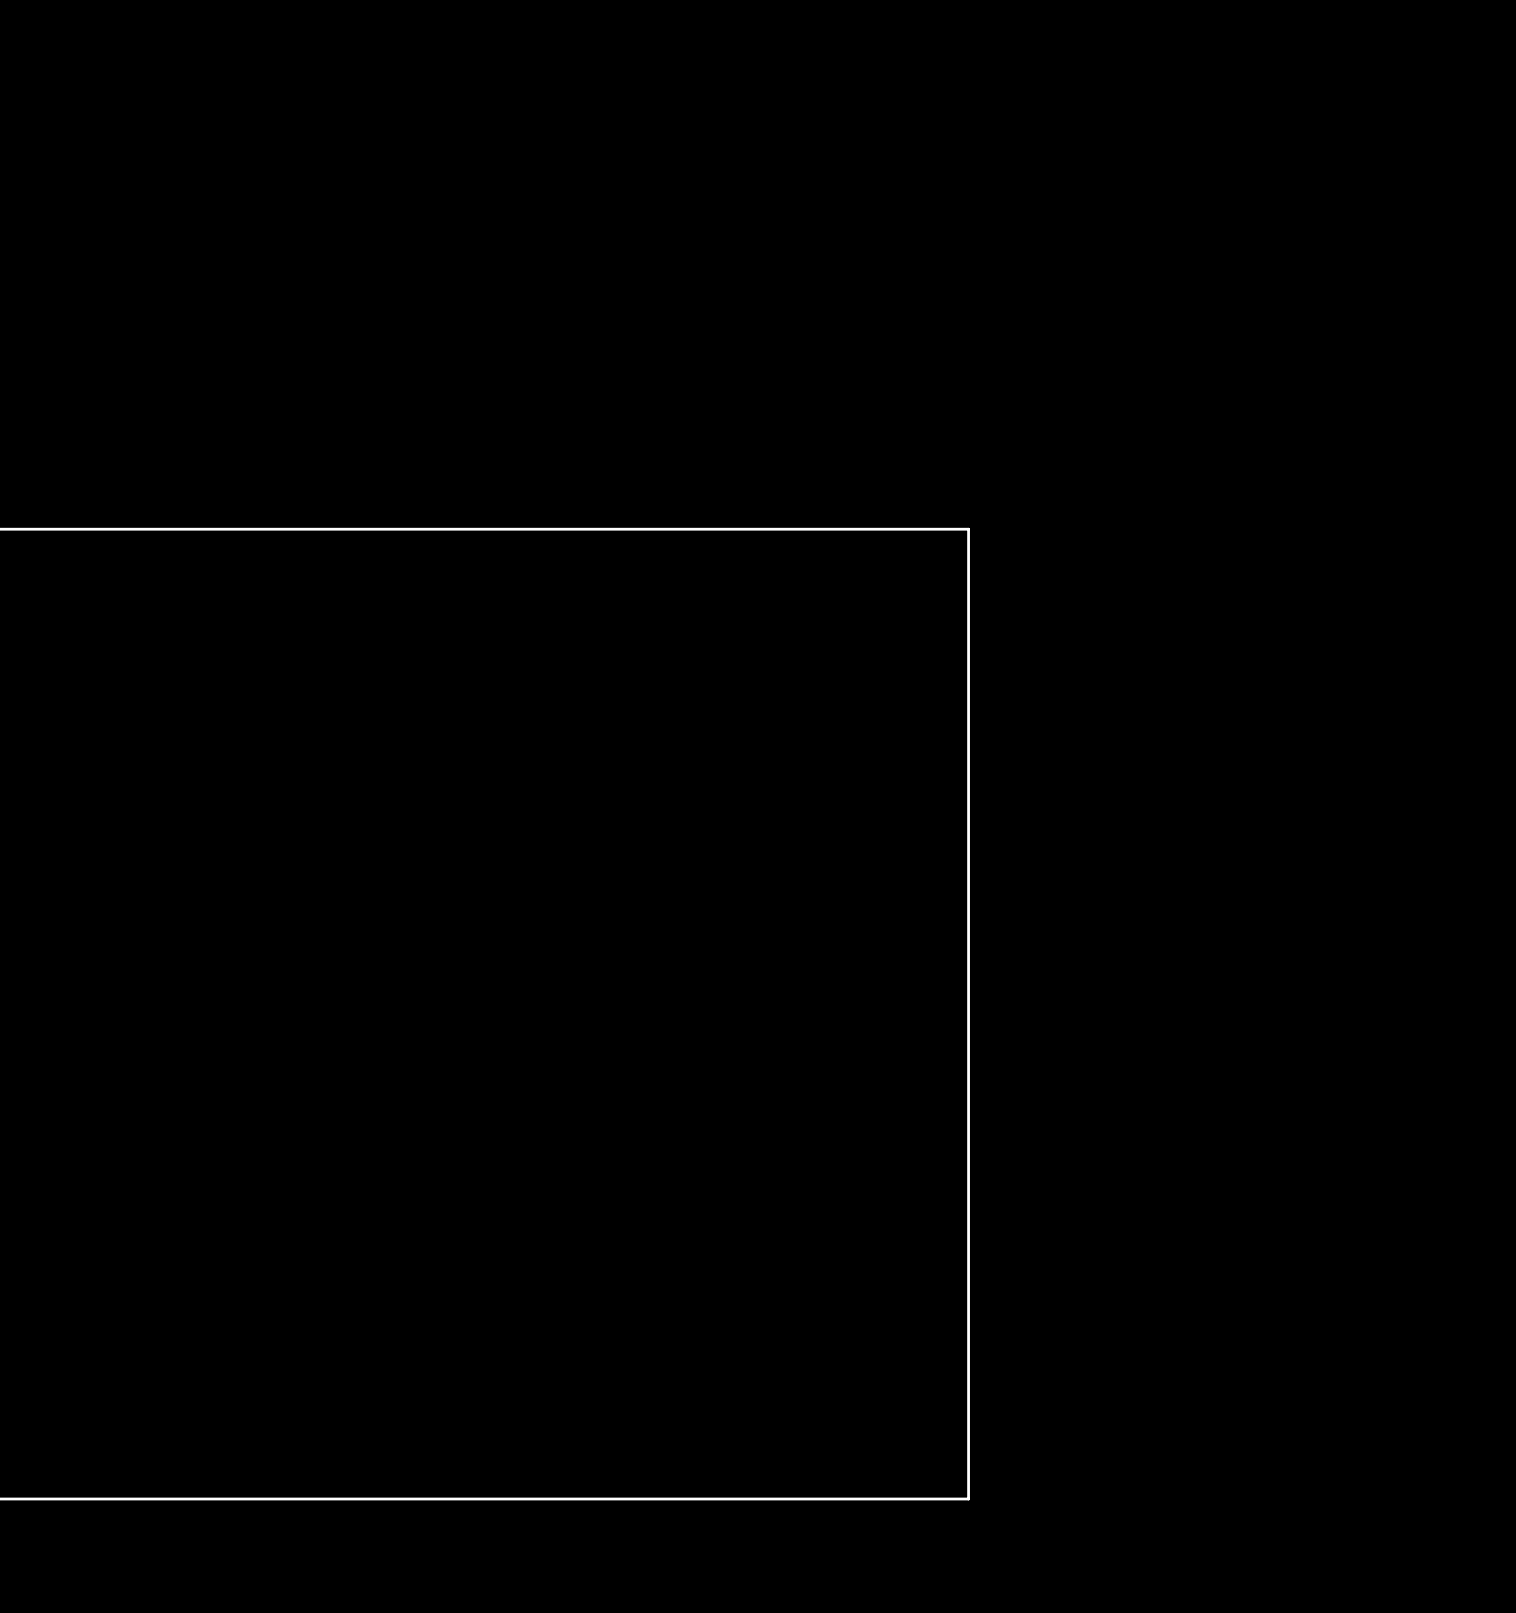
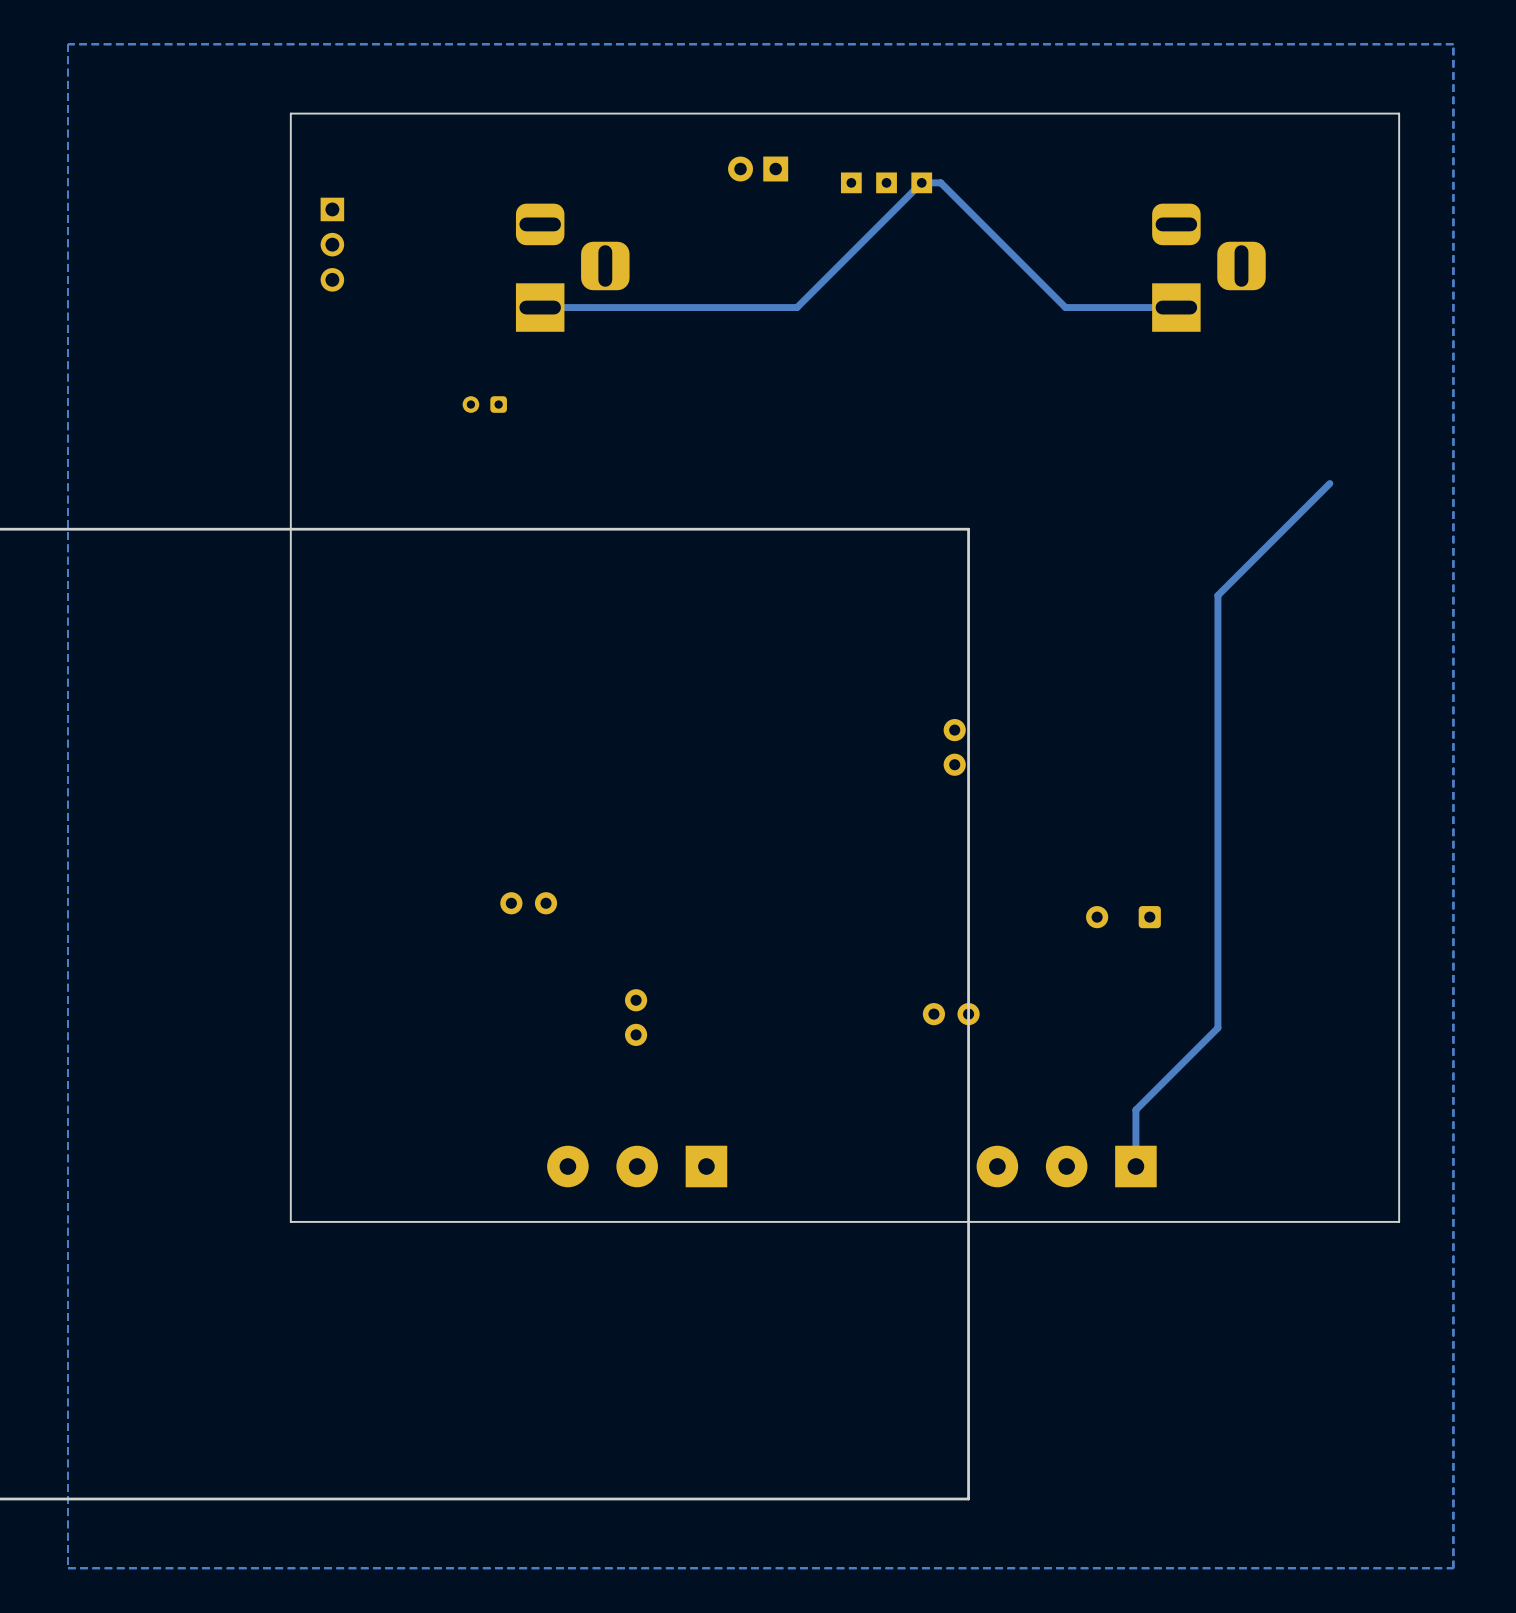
zone outline: none -> (1453, 44) (68, 44) (68, 1568) (1453, 1568) (1453, 44)
board edge: none -> (1399, 113) (290, 113) (290, 1221) (1399, 1221) (1399, 113)
part: none -> (758, 169)
part: none -> (886, 182)
part: none -> (332, 244)
part: none -> (572, 267)
part: none -> (1208, 267)
track: none -> (1176, 307) (1065, 307) (940, 182) (921, 182) (797, 307) (540, 307)
part: none -> (484, 404)
track: none -> (1329, 483) (1217, 595) (1217, 1027) (1135, 1109) (1135, 1166)
part: none -> (954, 747)
part: none -> (528, 903)
part: none -> (1123, 917)
part: none -> (951, 1014)
part: none -> (636, 1017)
part: none -> (637, 1166)
part: none -> (1066, 1166)

